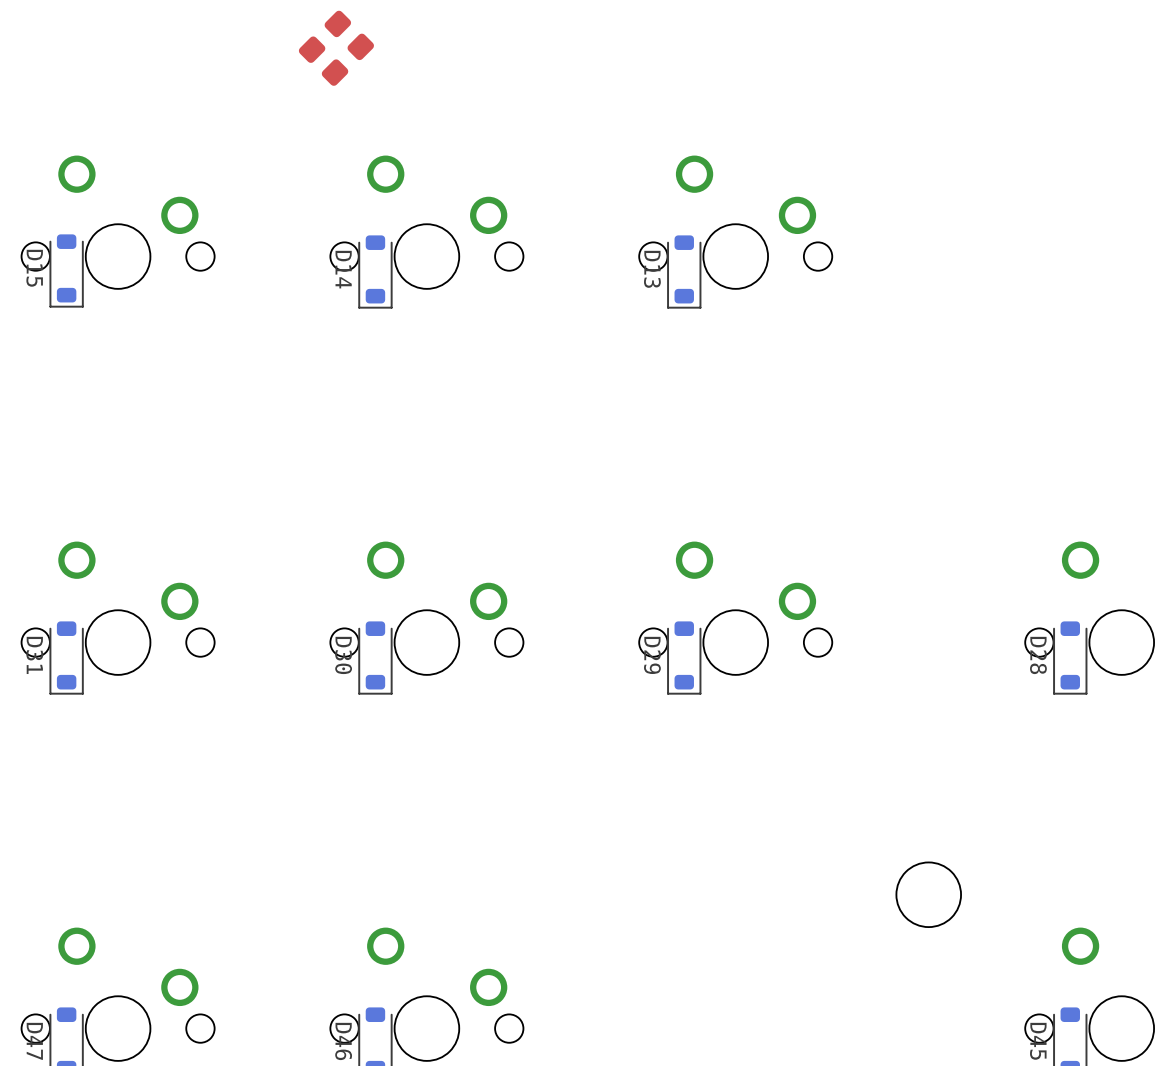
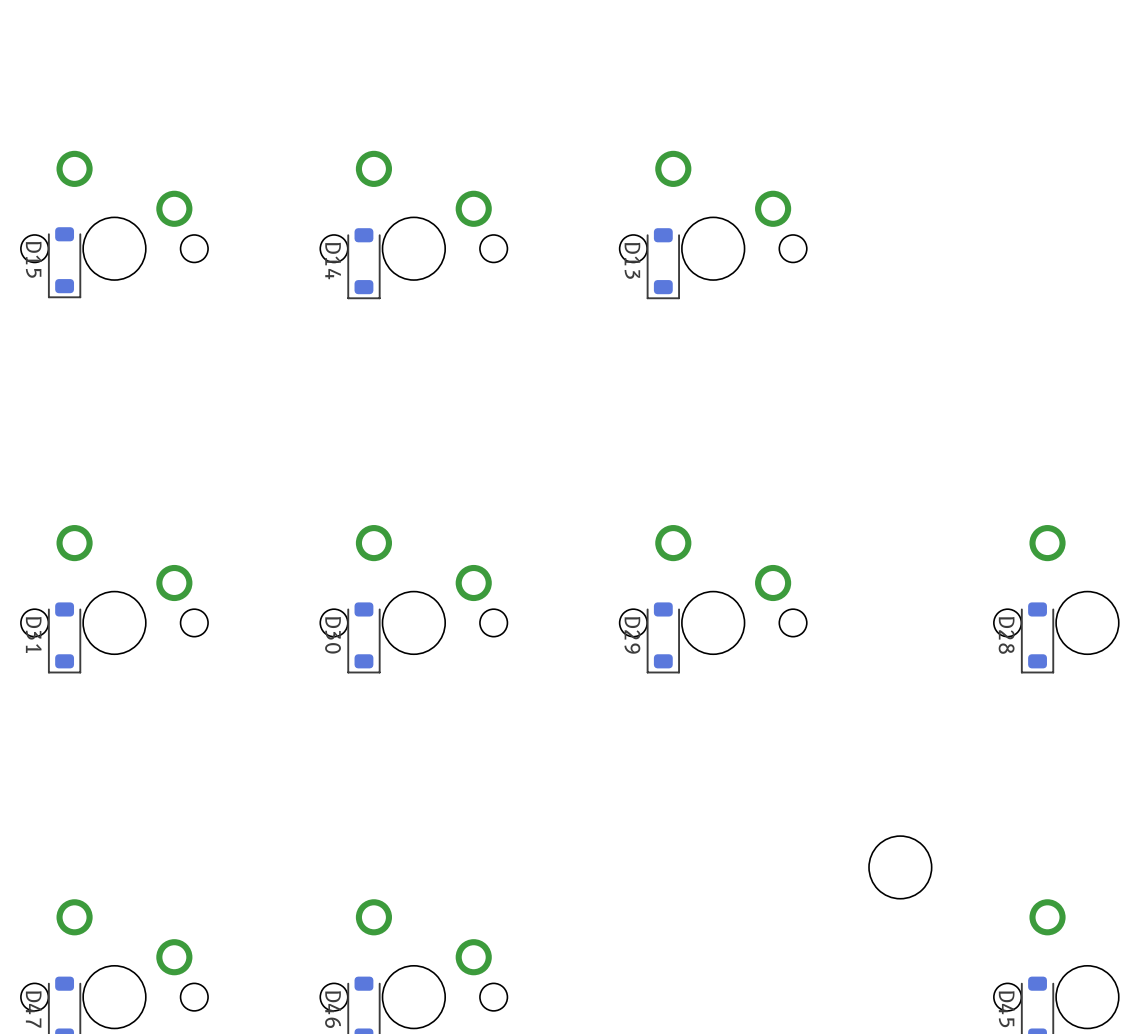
part: (349, 35) -> none
part: (323, 61) -> none

